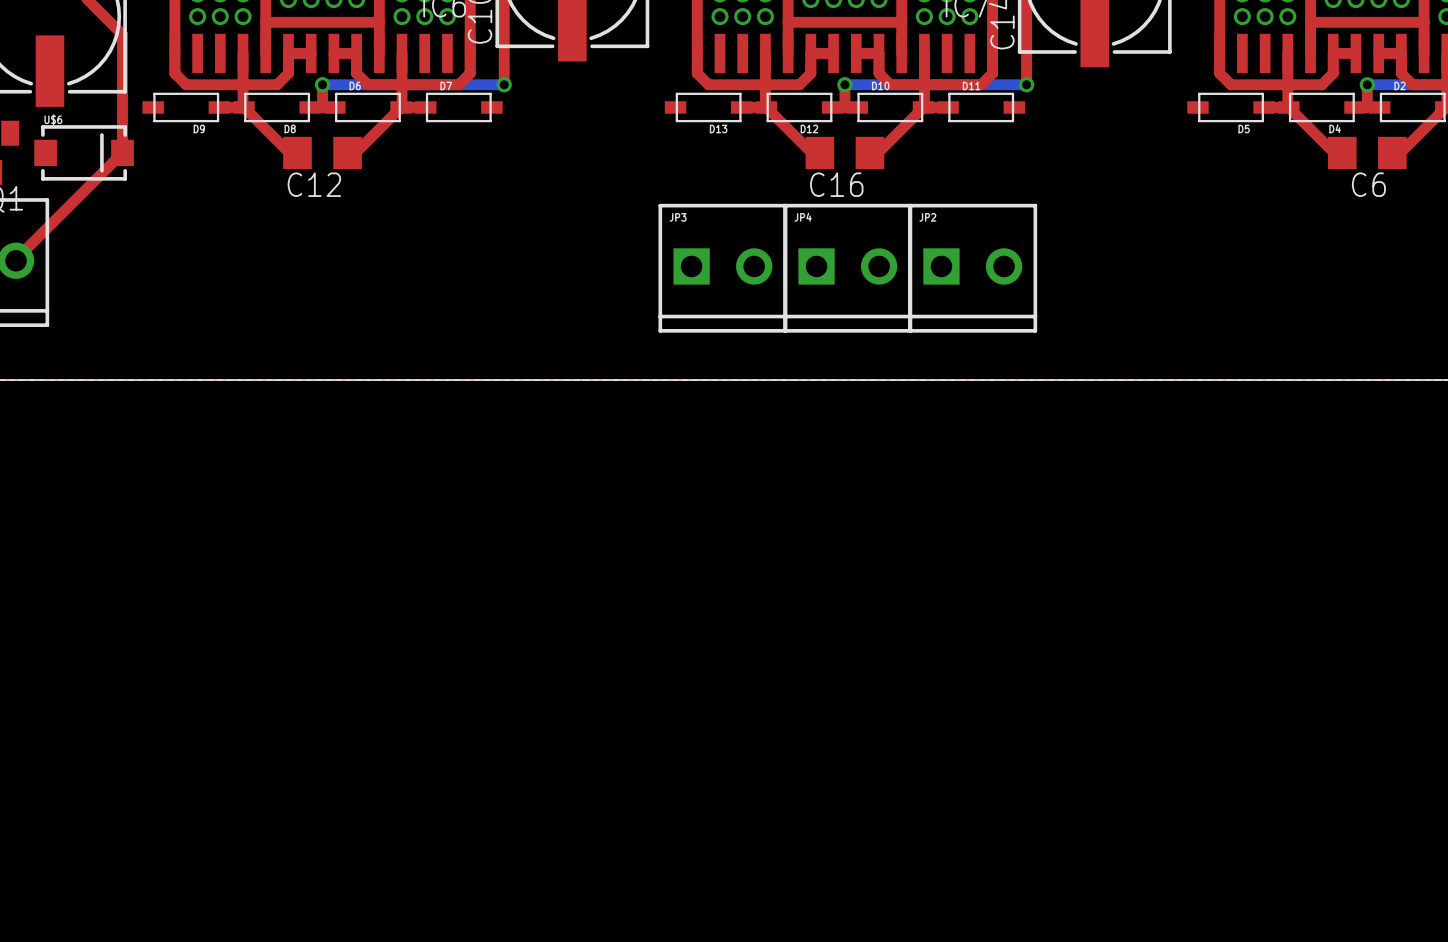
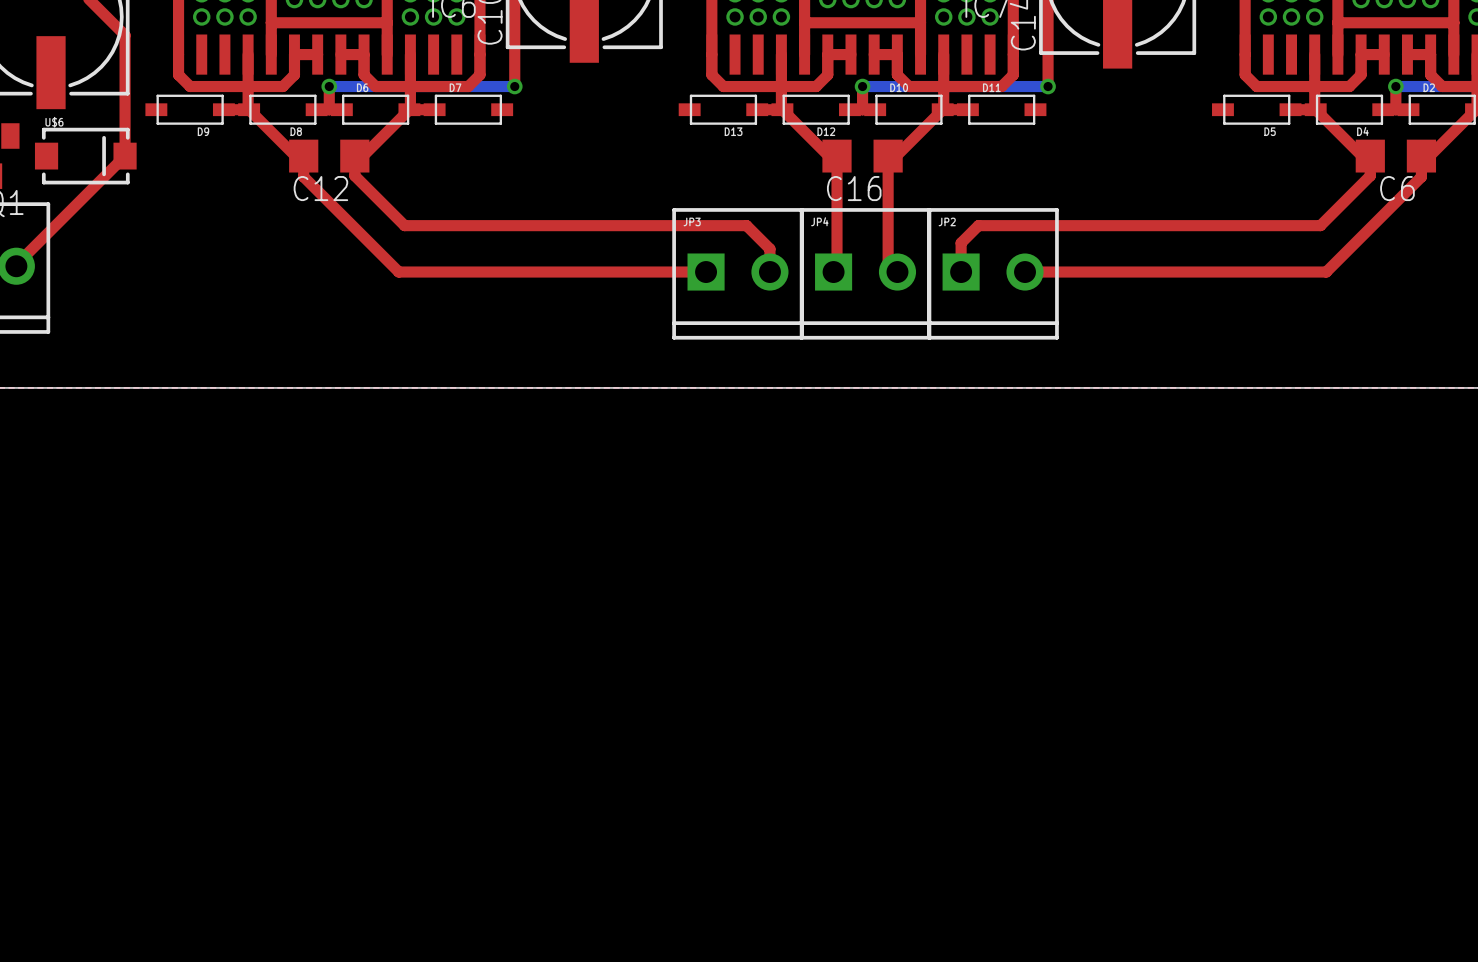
top track: none -> (303, 156) (303, 176) (398, 272) (706, 272)
top track: none -> (354, 156) (354, 175) (404, 225) (746, 225) (769, 248) (769, 272)
top track: none -> (837, 156) (837, 268) (833, 272)
top track: none -> (888, 156) (888, 262) (897, 272)
top track: none -> (1370, 156) (1370, 175) (1320, 225) (978, 225) (961, 243) (961, 272)
top track: none -> (1421, 156) (1421, 176) (1326, 272) (1025, 272)

